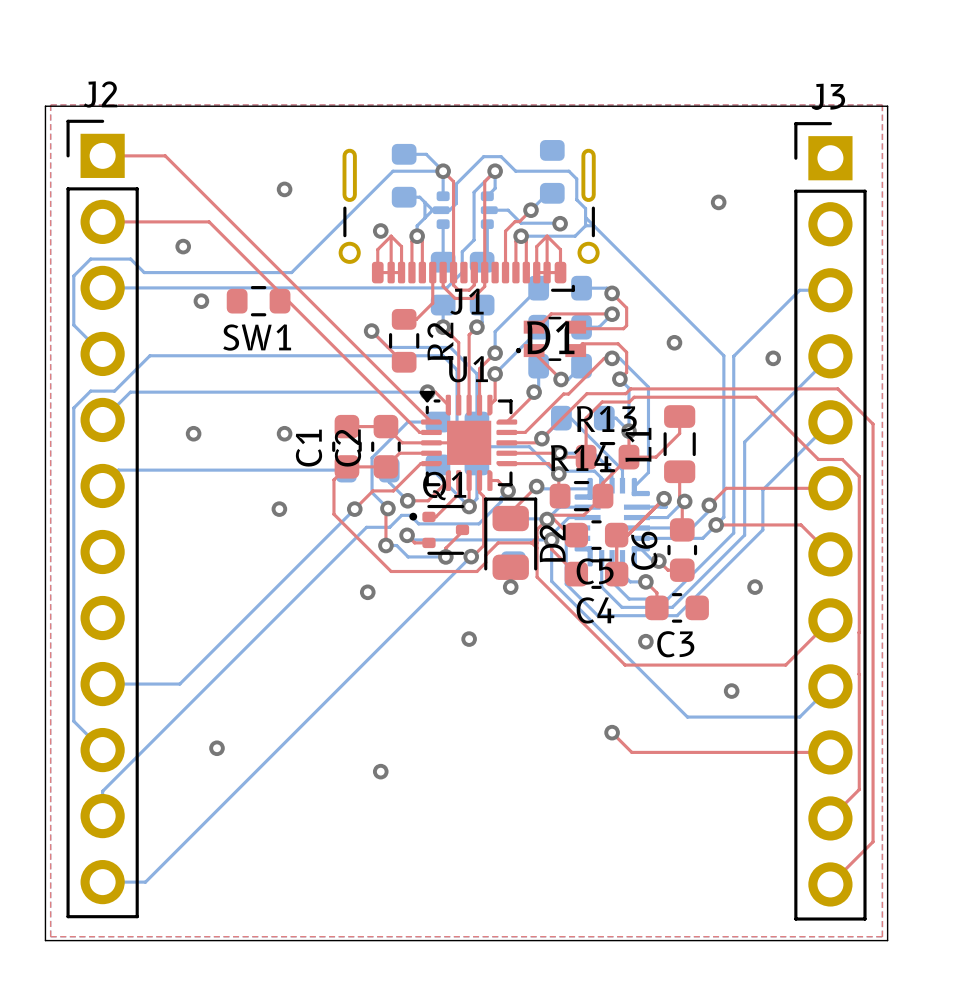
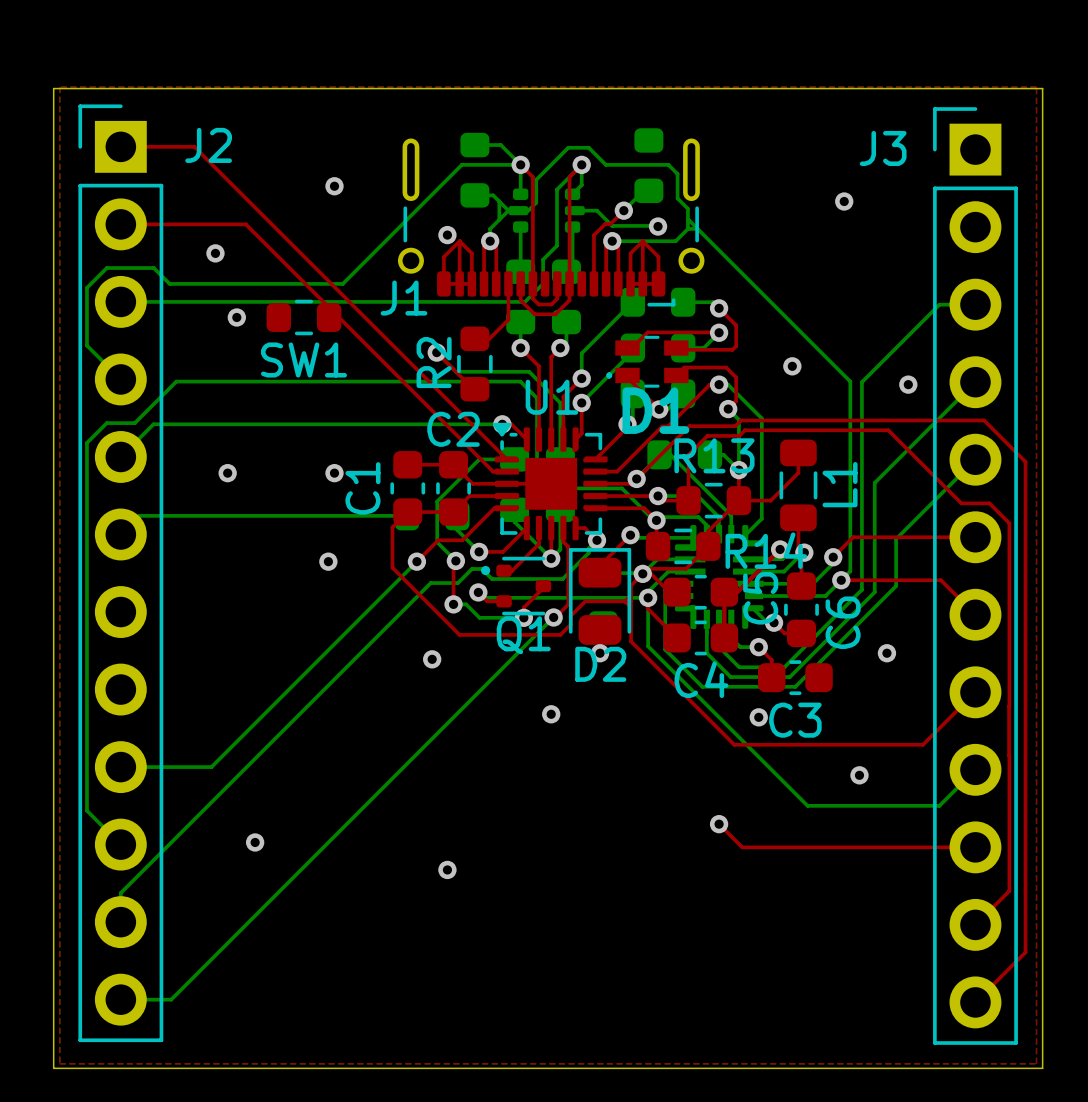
J2 name position: J2 (100, 94) -> J2 (208, 145)
J3 name position: J3 (828, 96) -> J3 (883, 148)
J1 name position: J1 (466, 301) -> J1 (403, 298)
D1 name position: D1 (550, 337) -> D1 (655, 410)
R2 name position: R2 (440, 341) -> R2 (434, 362)
L1 name position: L1 (638, 444) -> L1 (840, 484)
C2 name rotation: 0° (347, 448) -> 90° clockwise (453, 429)
R14 name position: R14 (581, 457) -> R14 (766, 550)
Q1 name position: Q1 (444, 485) -> Q1 (523, 635)
D2 name rotation: 0° (552, 543) -> 90° clockwise (600, 664)
D2 name position: D2 (552, 543) -> D2 (600, 664)
C6 name position: C6 (644, 550) -> C6 (843, 622)
C5 name rotation: 0° (595, 571) -> 90° counterclockwise (760, 598)

